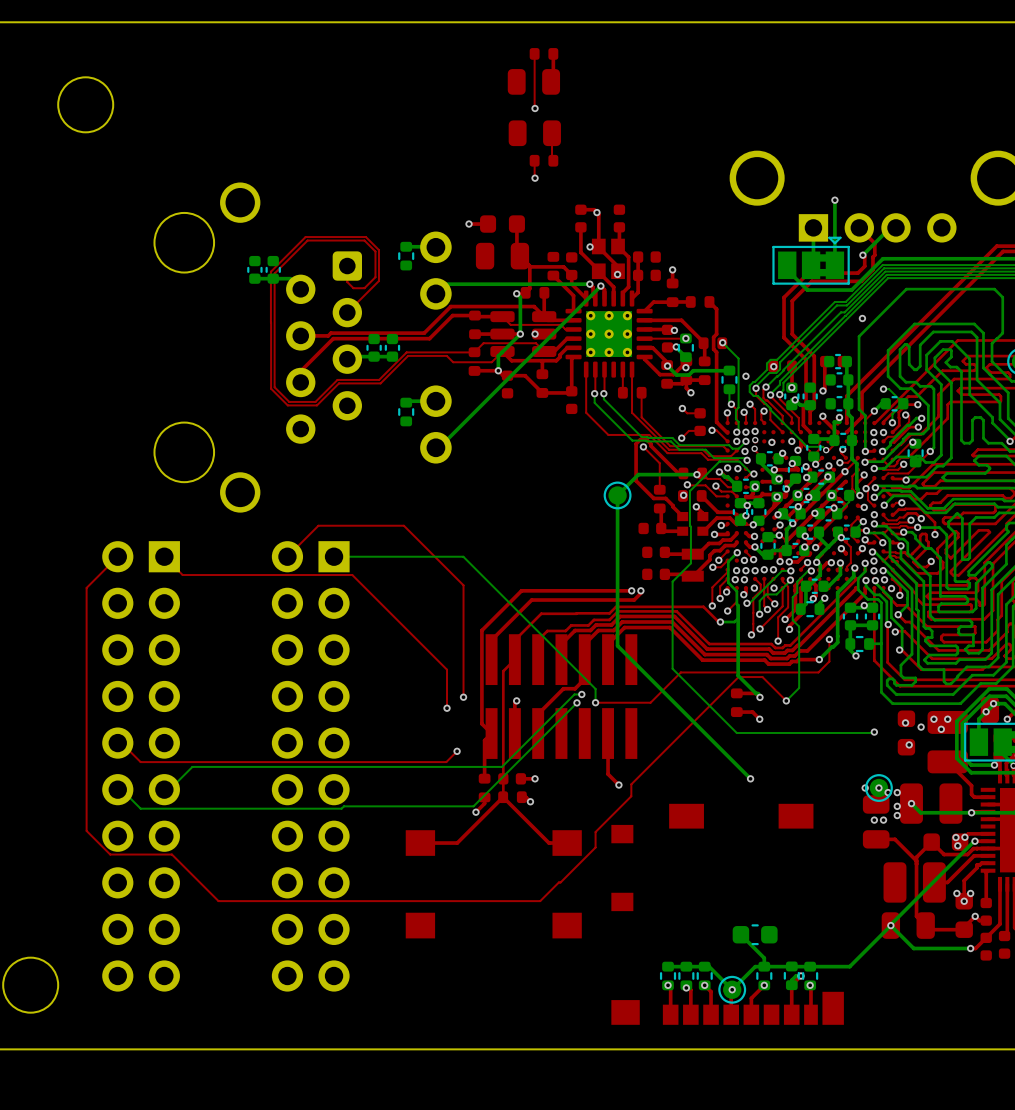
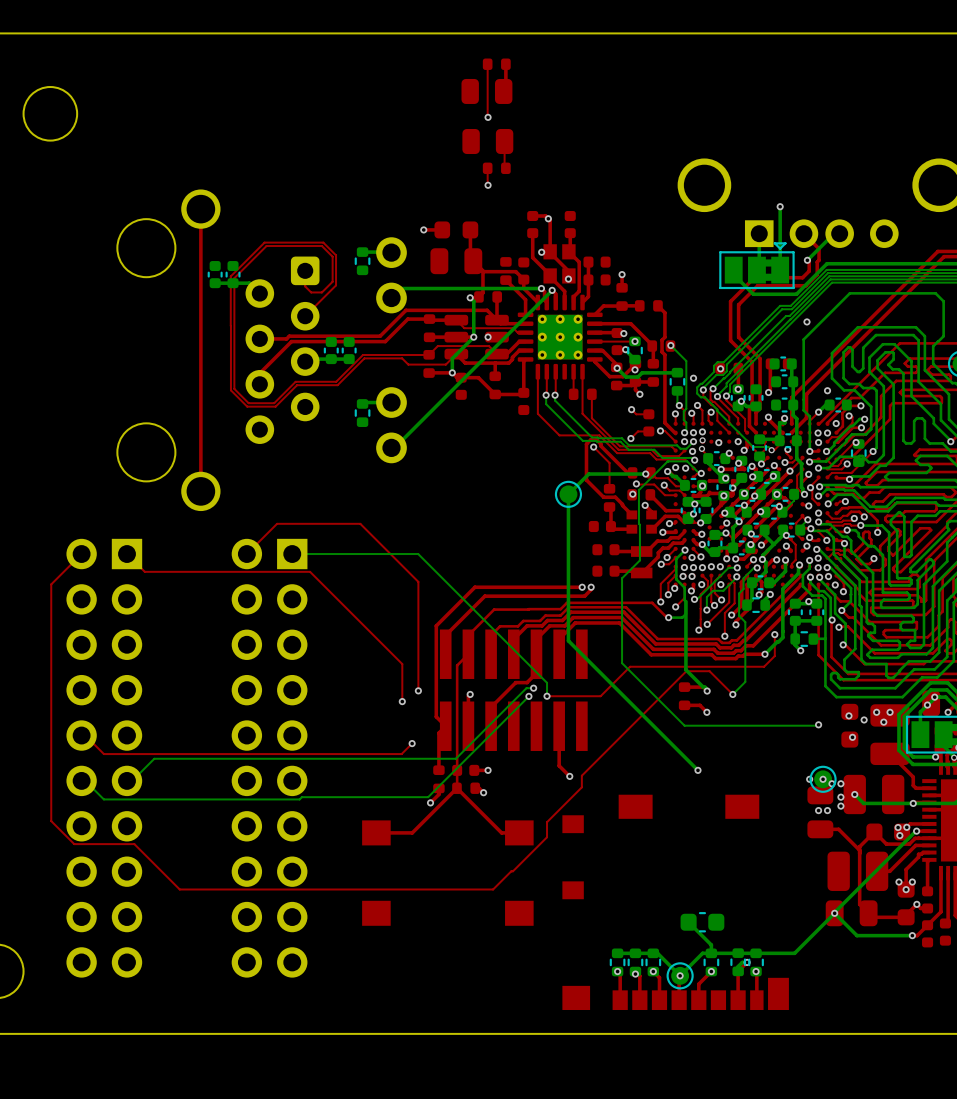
top track: none -> (200, 209) (200, 491)
bottom track: (883, 389) (889, 389) (903, 403) -> none
bottom track: (903, 403) (892, 414) (892, 422) -> none

